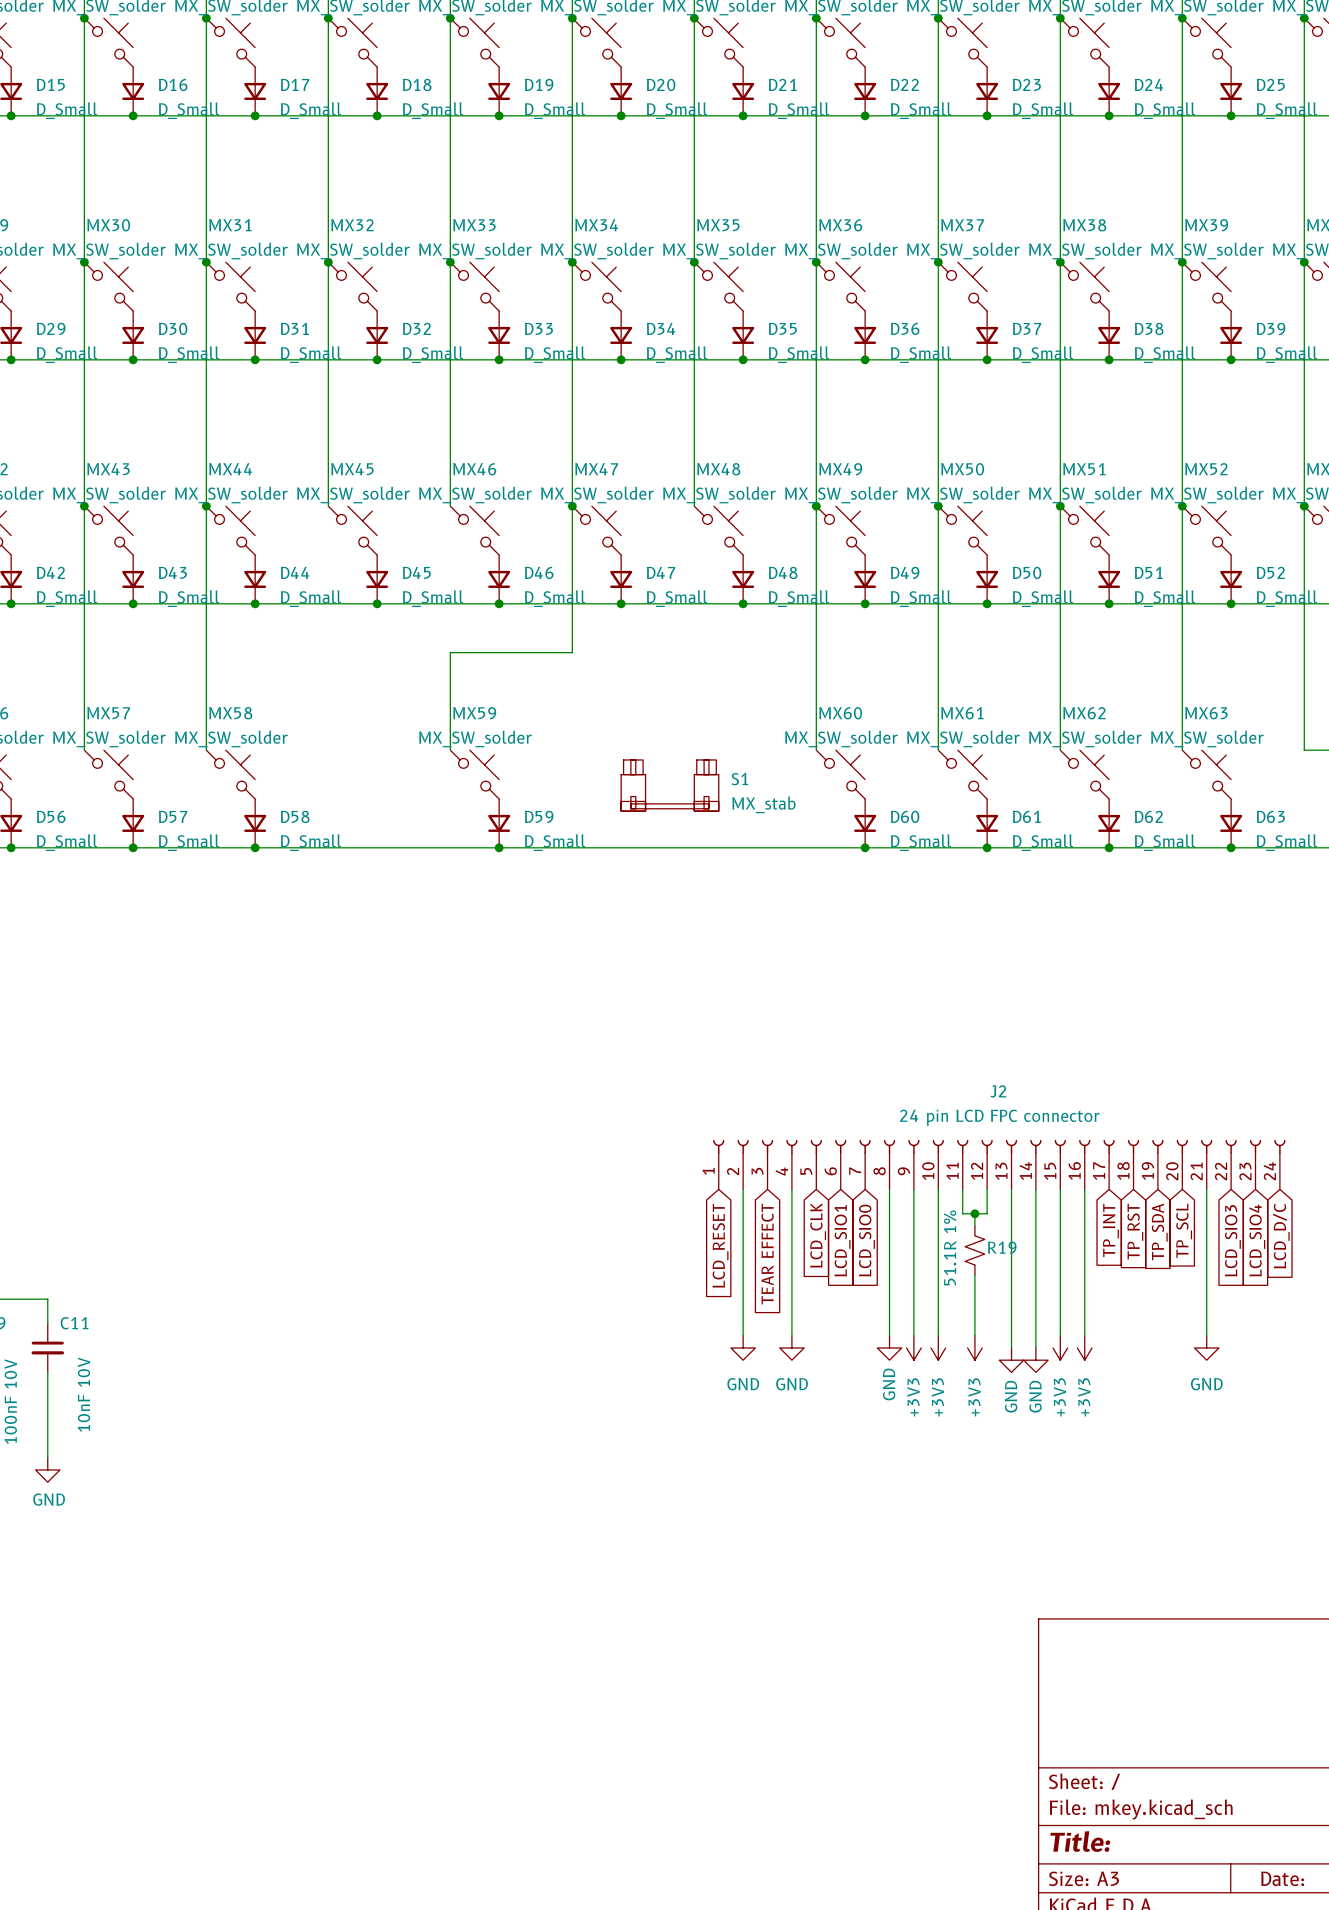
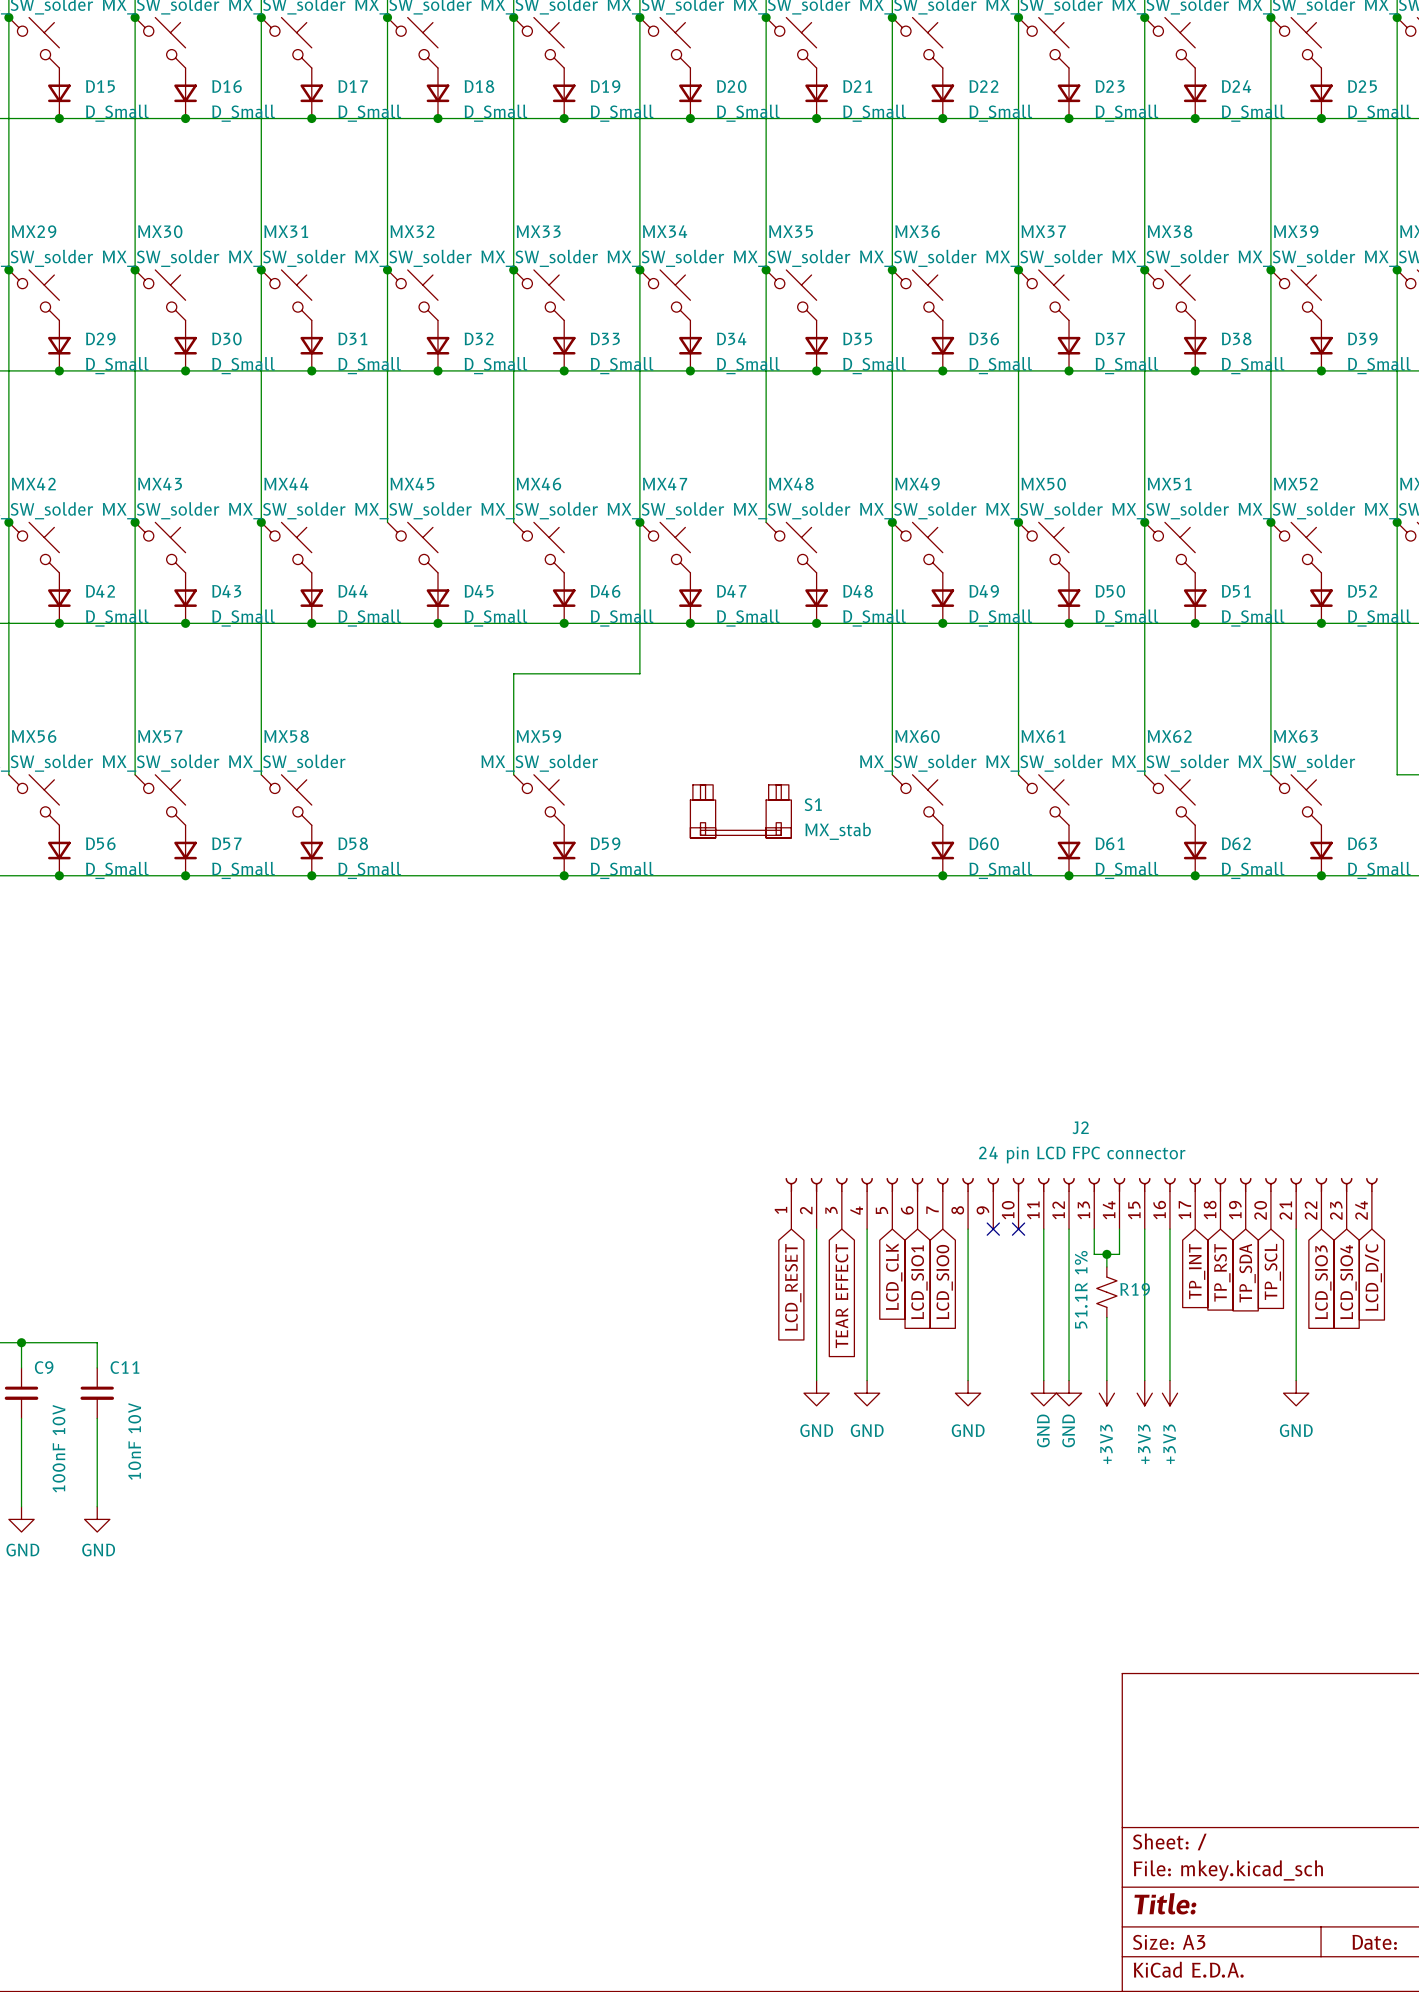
wire: (913, 1189) (913, 1335) -> none
no-connect mark: none -> (993, 1229)
wire: (938, 1189) (938, 1335) -> none
no-connect mark: none -> (1018, 1229)
wire: (962, 1213) (987, 1213) -> (1043, 1254) (1043, 1380)
wire: (974, 1213) (974, 1225) -> (1106, 1254) (1106, 1266)
junction position: (974, 1213) -> (1106, 1254)
wire: none -> (1069, 1254) (1069, 1380)
wire: (1011, 1213) (1011, 1347) -> (1094, 1254) (1119, 1254)
wire: (1035, 1213) (1035, 1347) -> none
R19 position: (974, 1250) -> (1106, 1292)
wire: (974, 1274) (974, 1335) -> (1106, 1317) (1106, 1380)
power symbol: +3V3 (913, 1347) -> none
power symbol: +3V3 (938, 1347) -> none
power symbol: none -> GND (1043, 1393)
power symbol: +3V3 (974, 1347) -> none
power symbol: none -> GND (1069, 1393)
power symbol: none -> +3V3 (1106, 1393)
power symbol: GND (1011, 1360) -> none
power symbol: GND (1035, 1360) -> none
power symbol text rotation: 0° (889, 1384) -> 90° clockwise (968, 1430)

